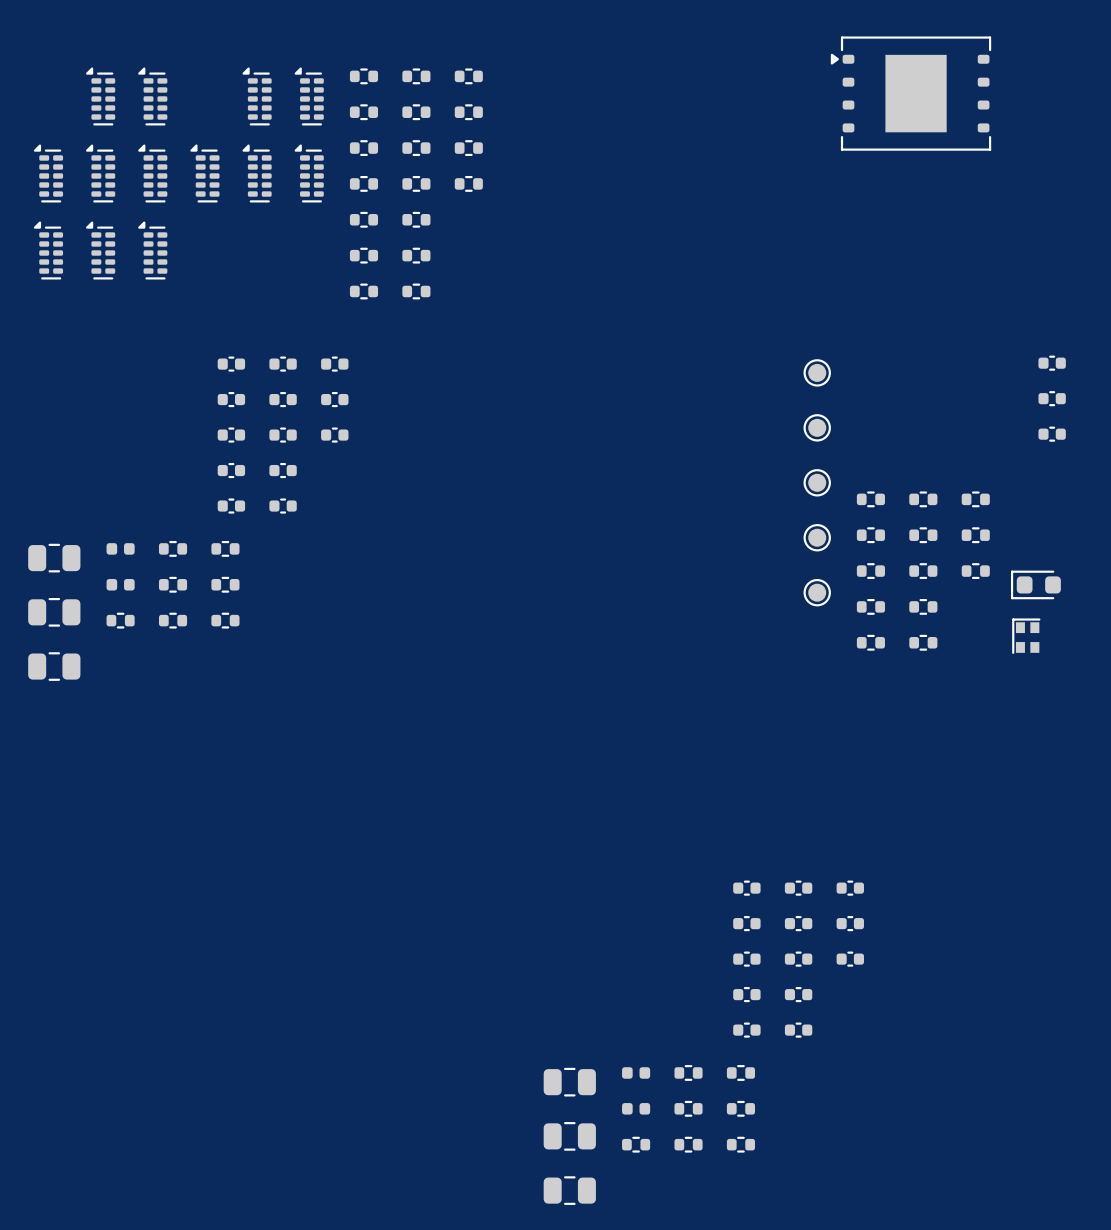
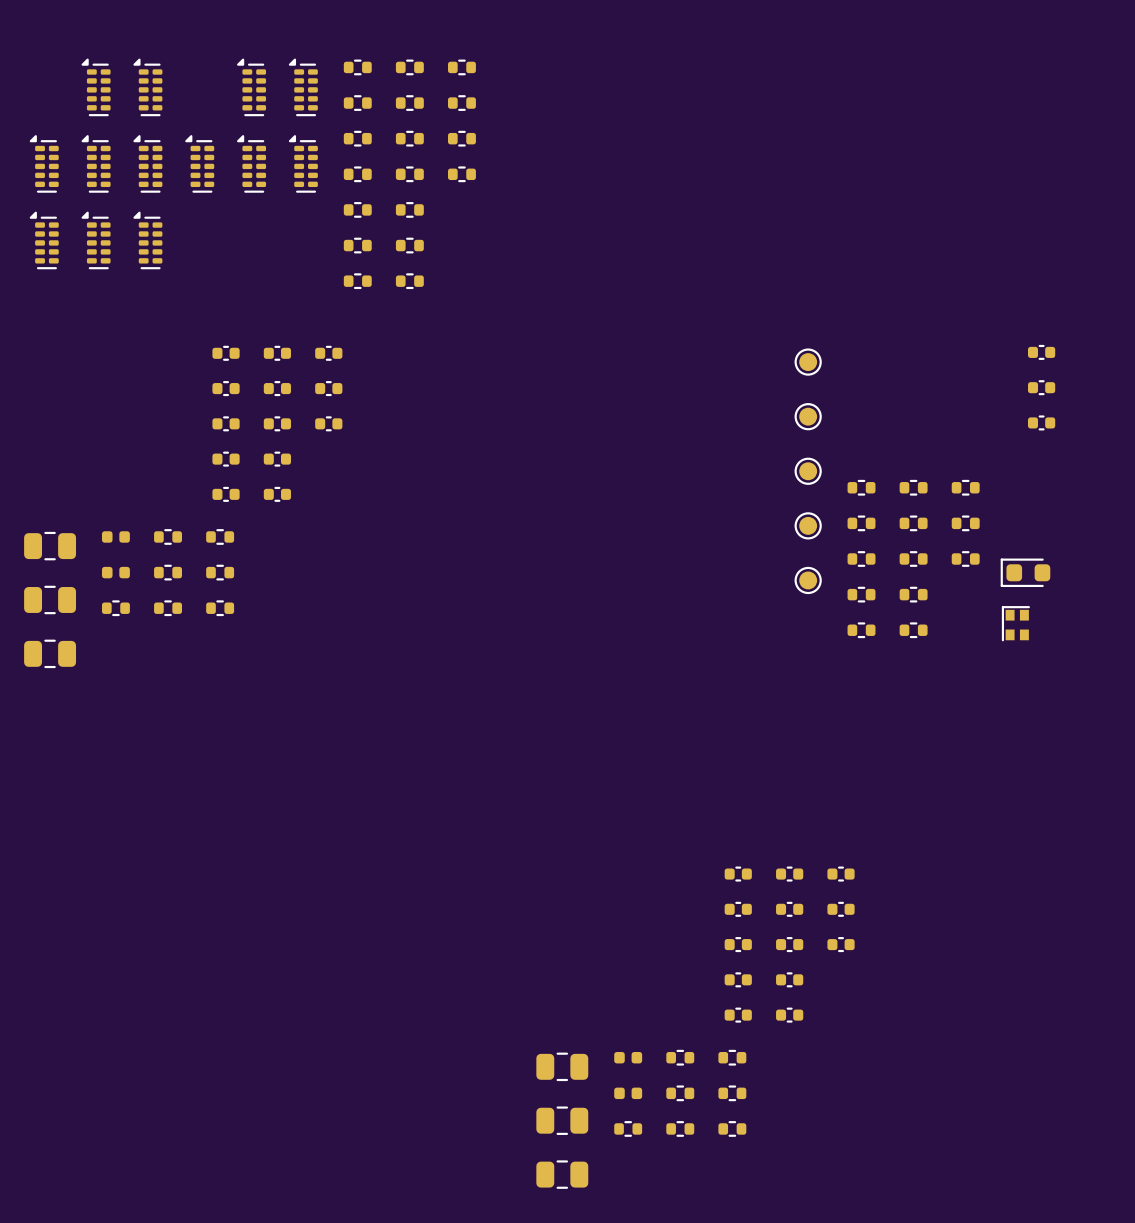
part: (911, 93) -> none

